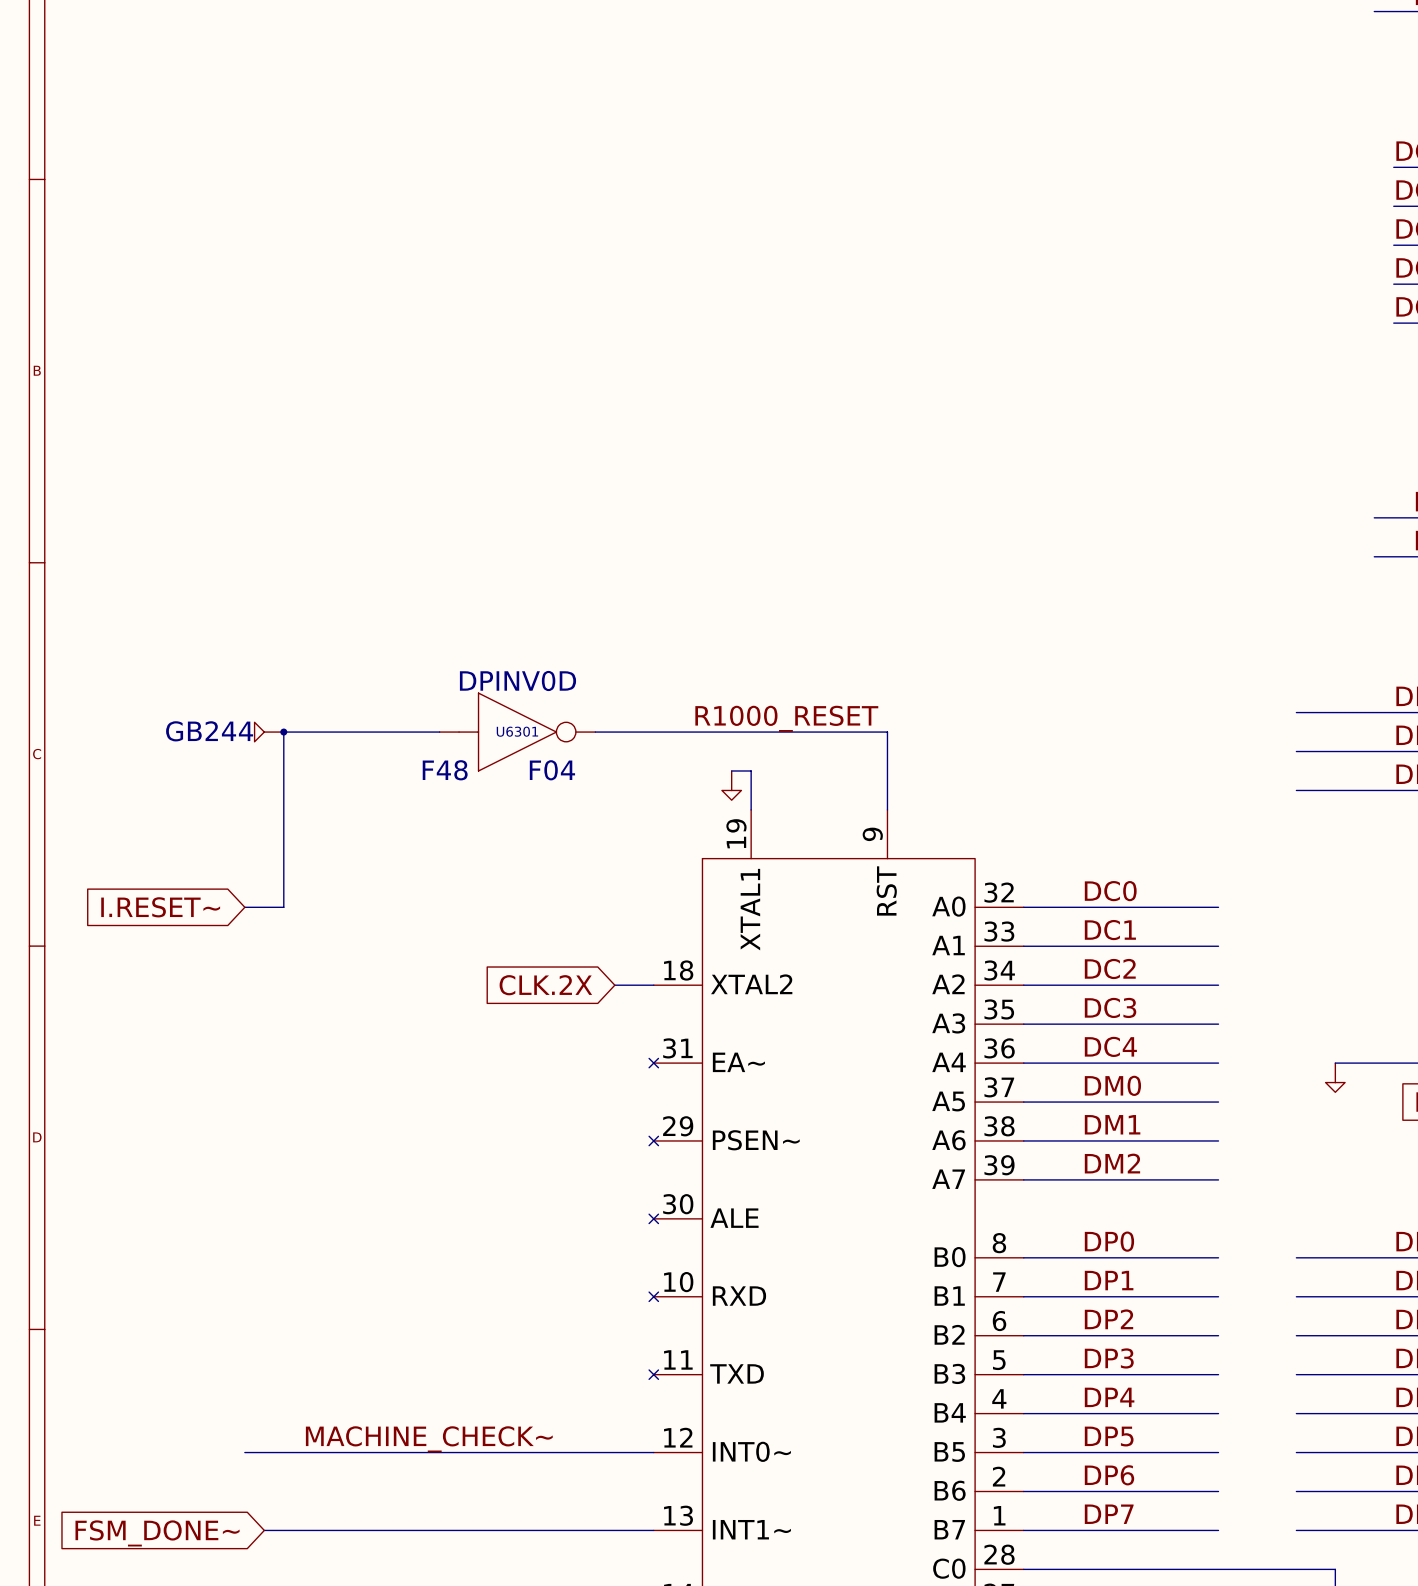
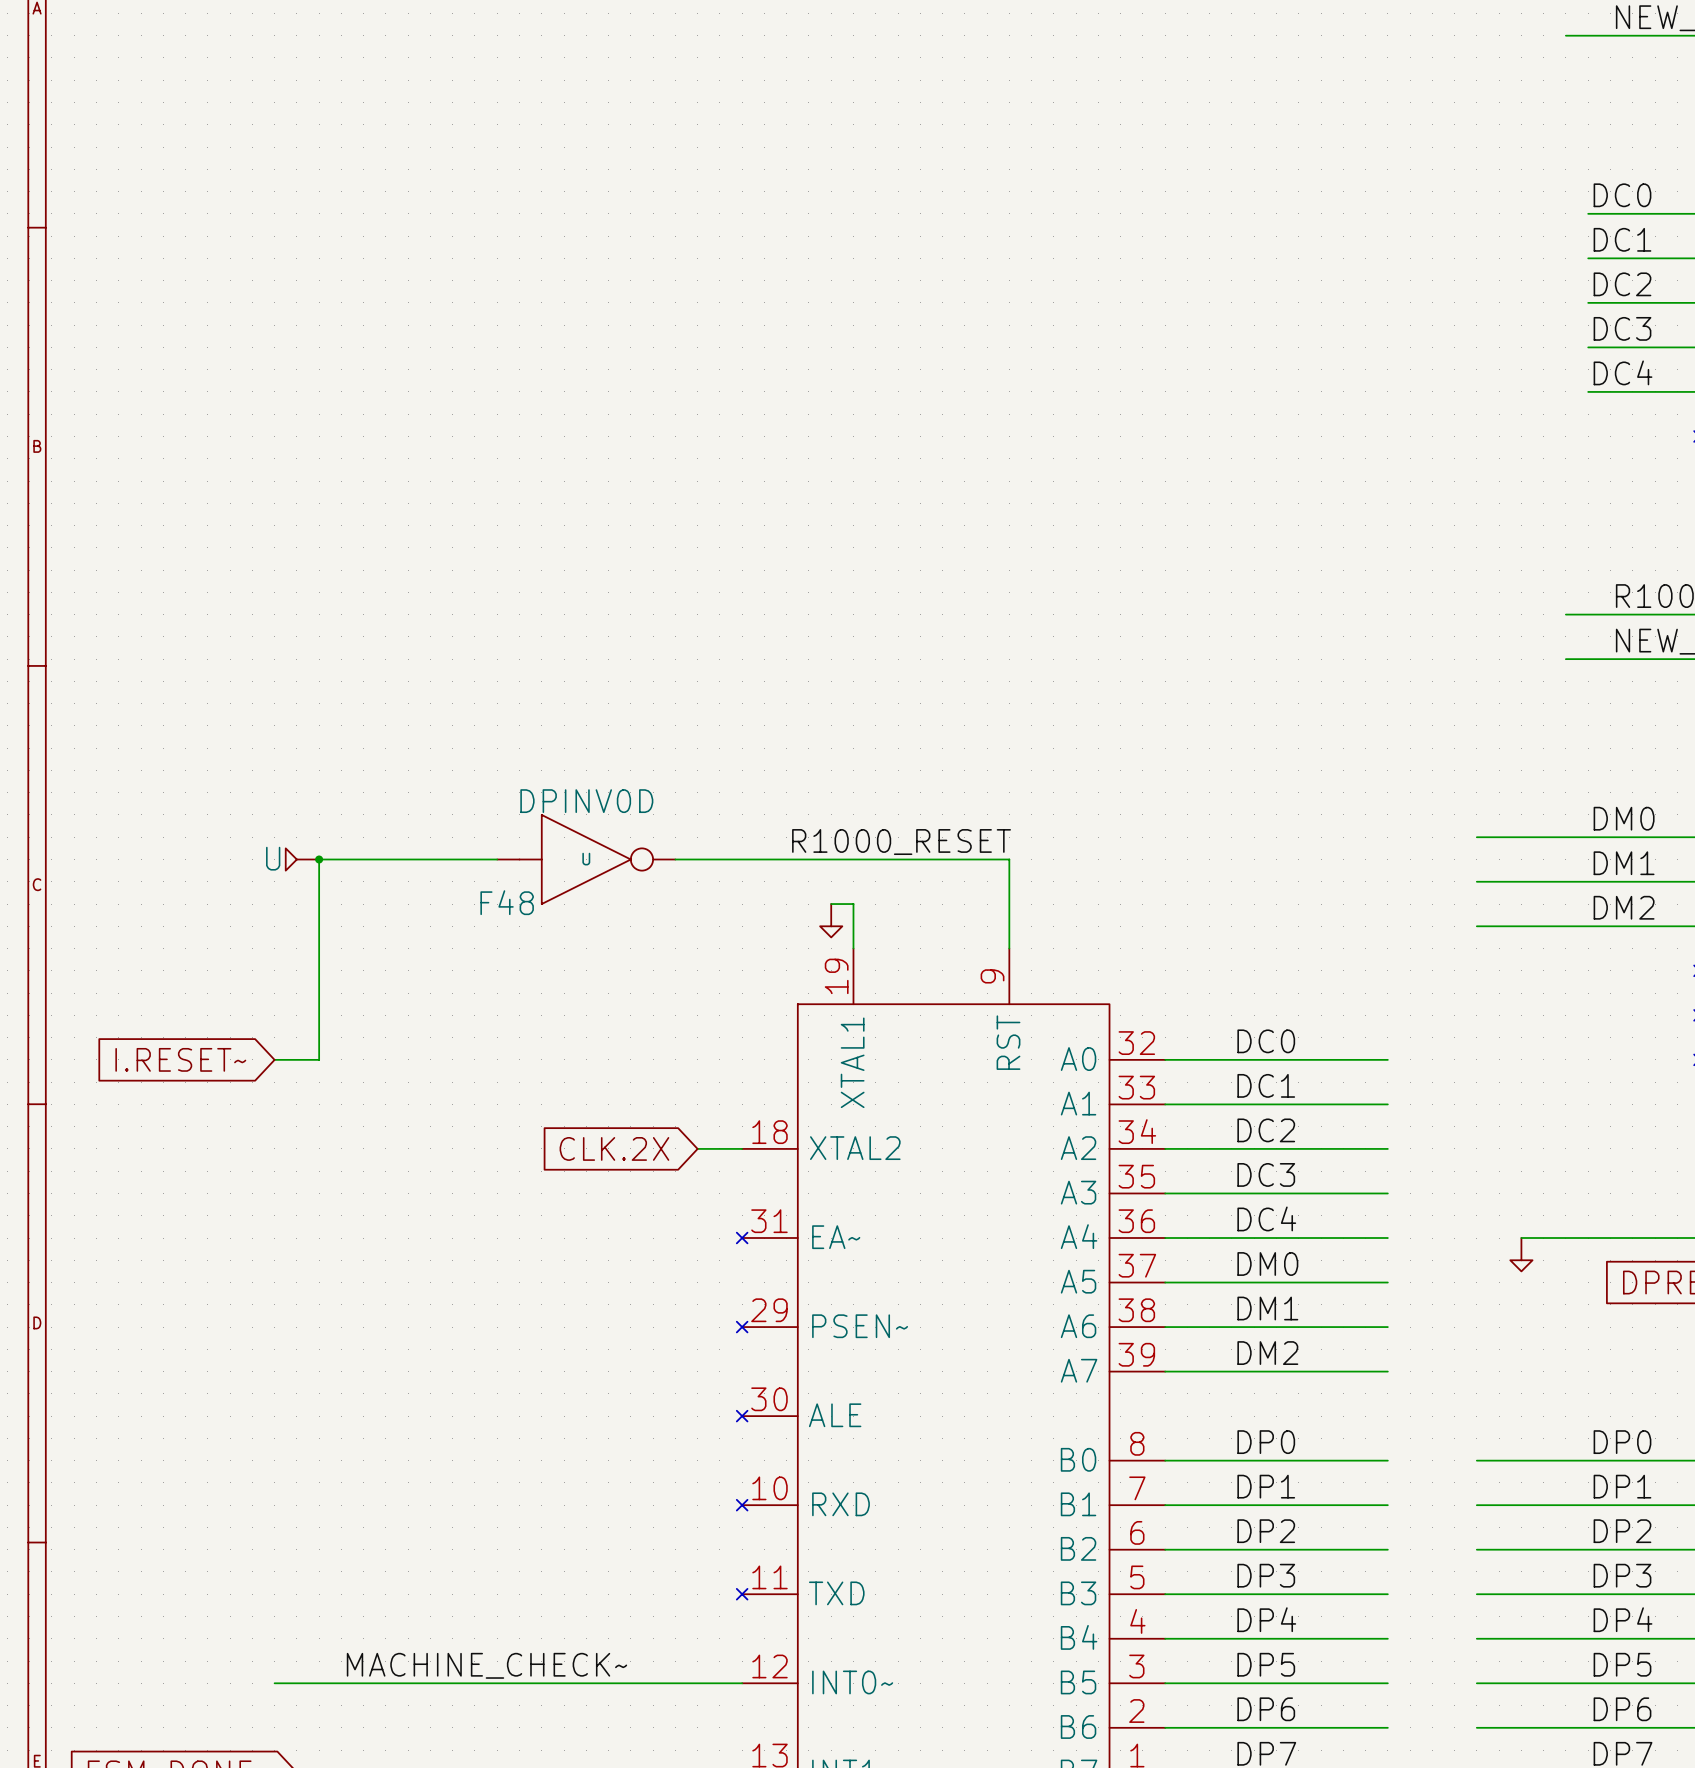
GB244 name: GB244 (209, 731) -> U (273, 858)
U6301 name: U6301 (517, 731) -> U (586, 859)
U6301 value: F04 (552, 770) -> none

